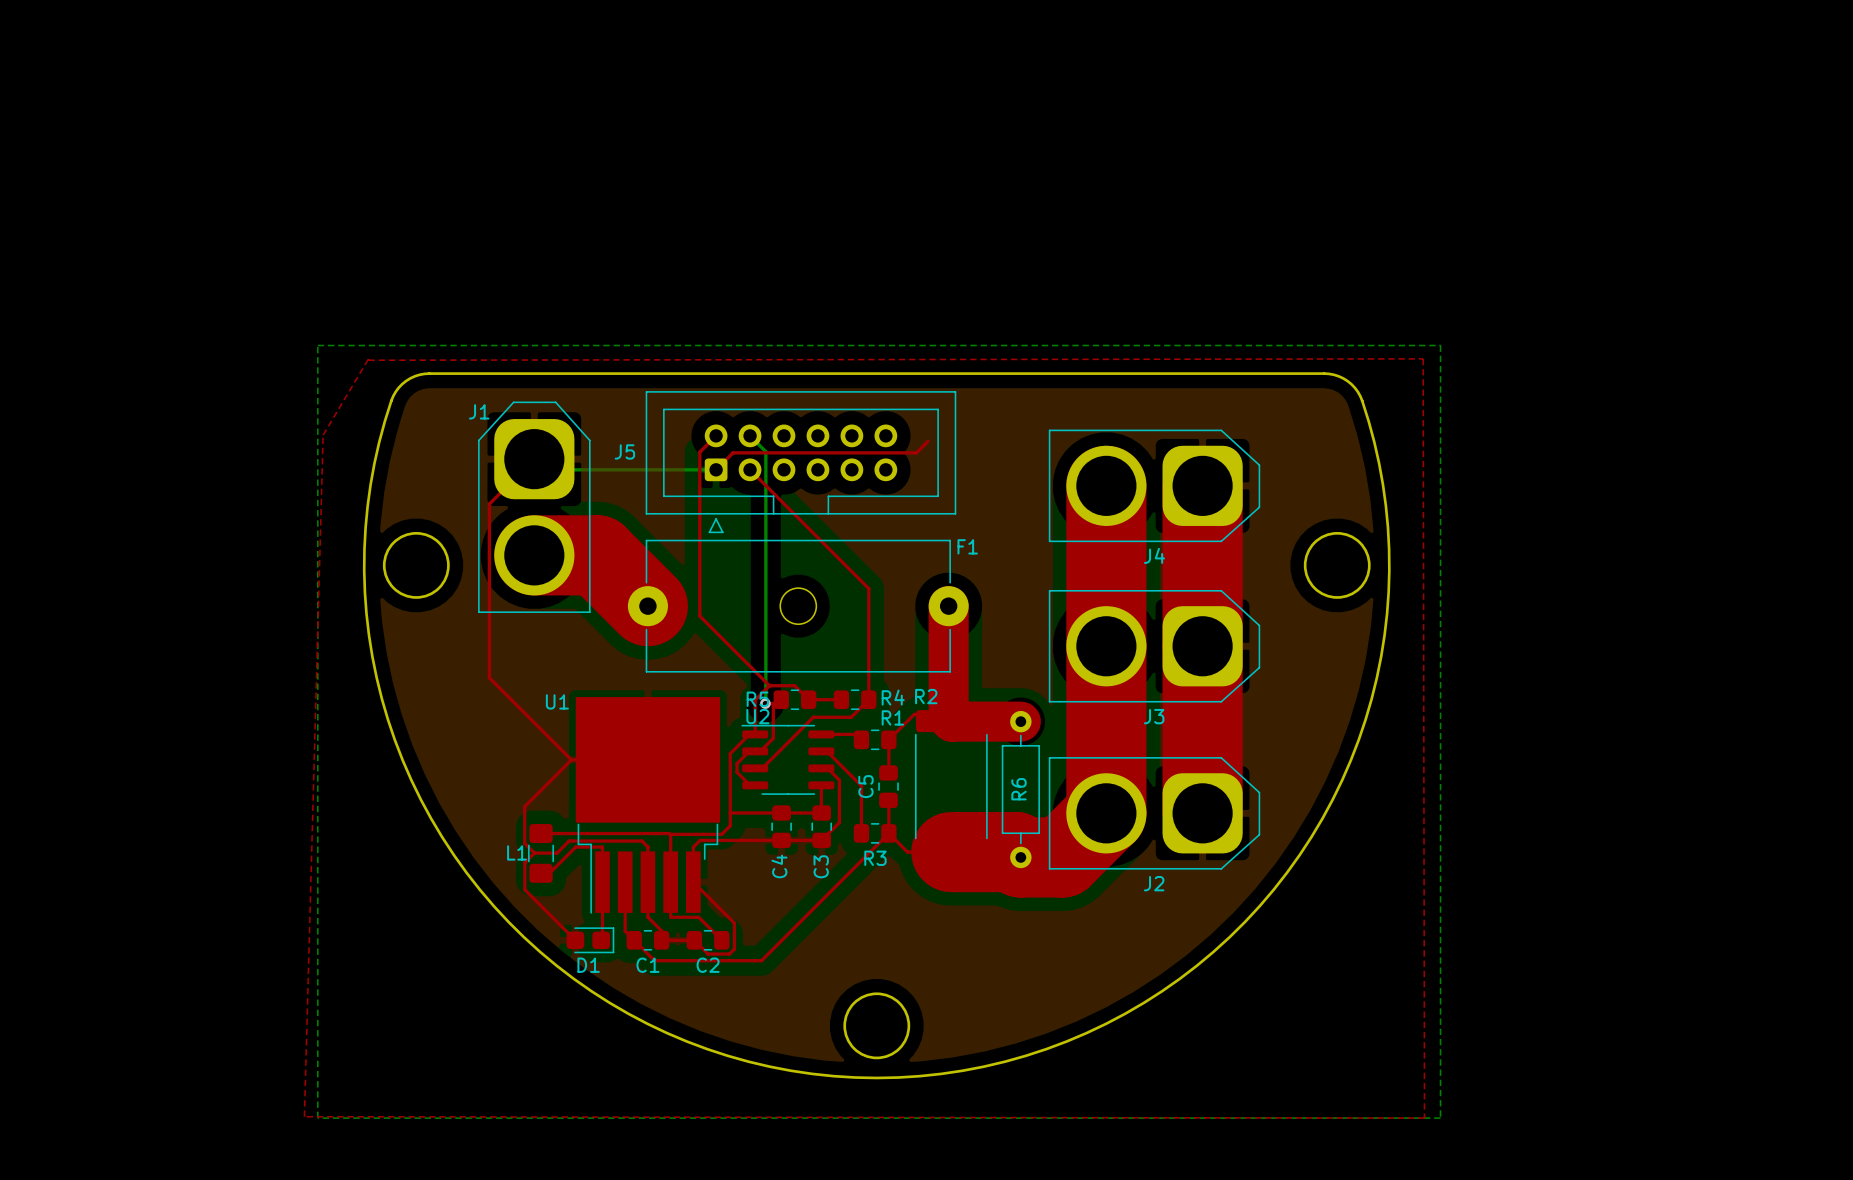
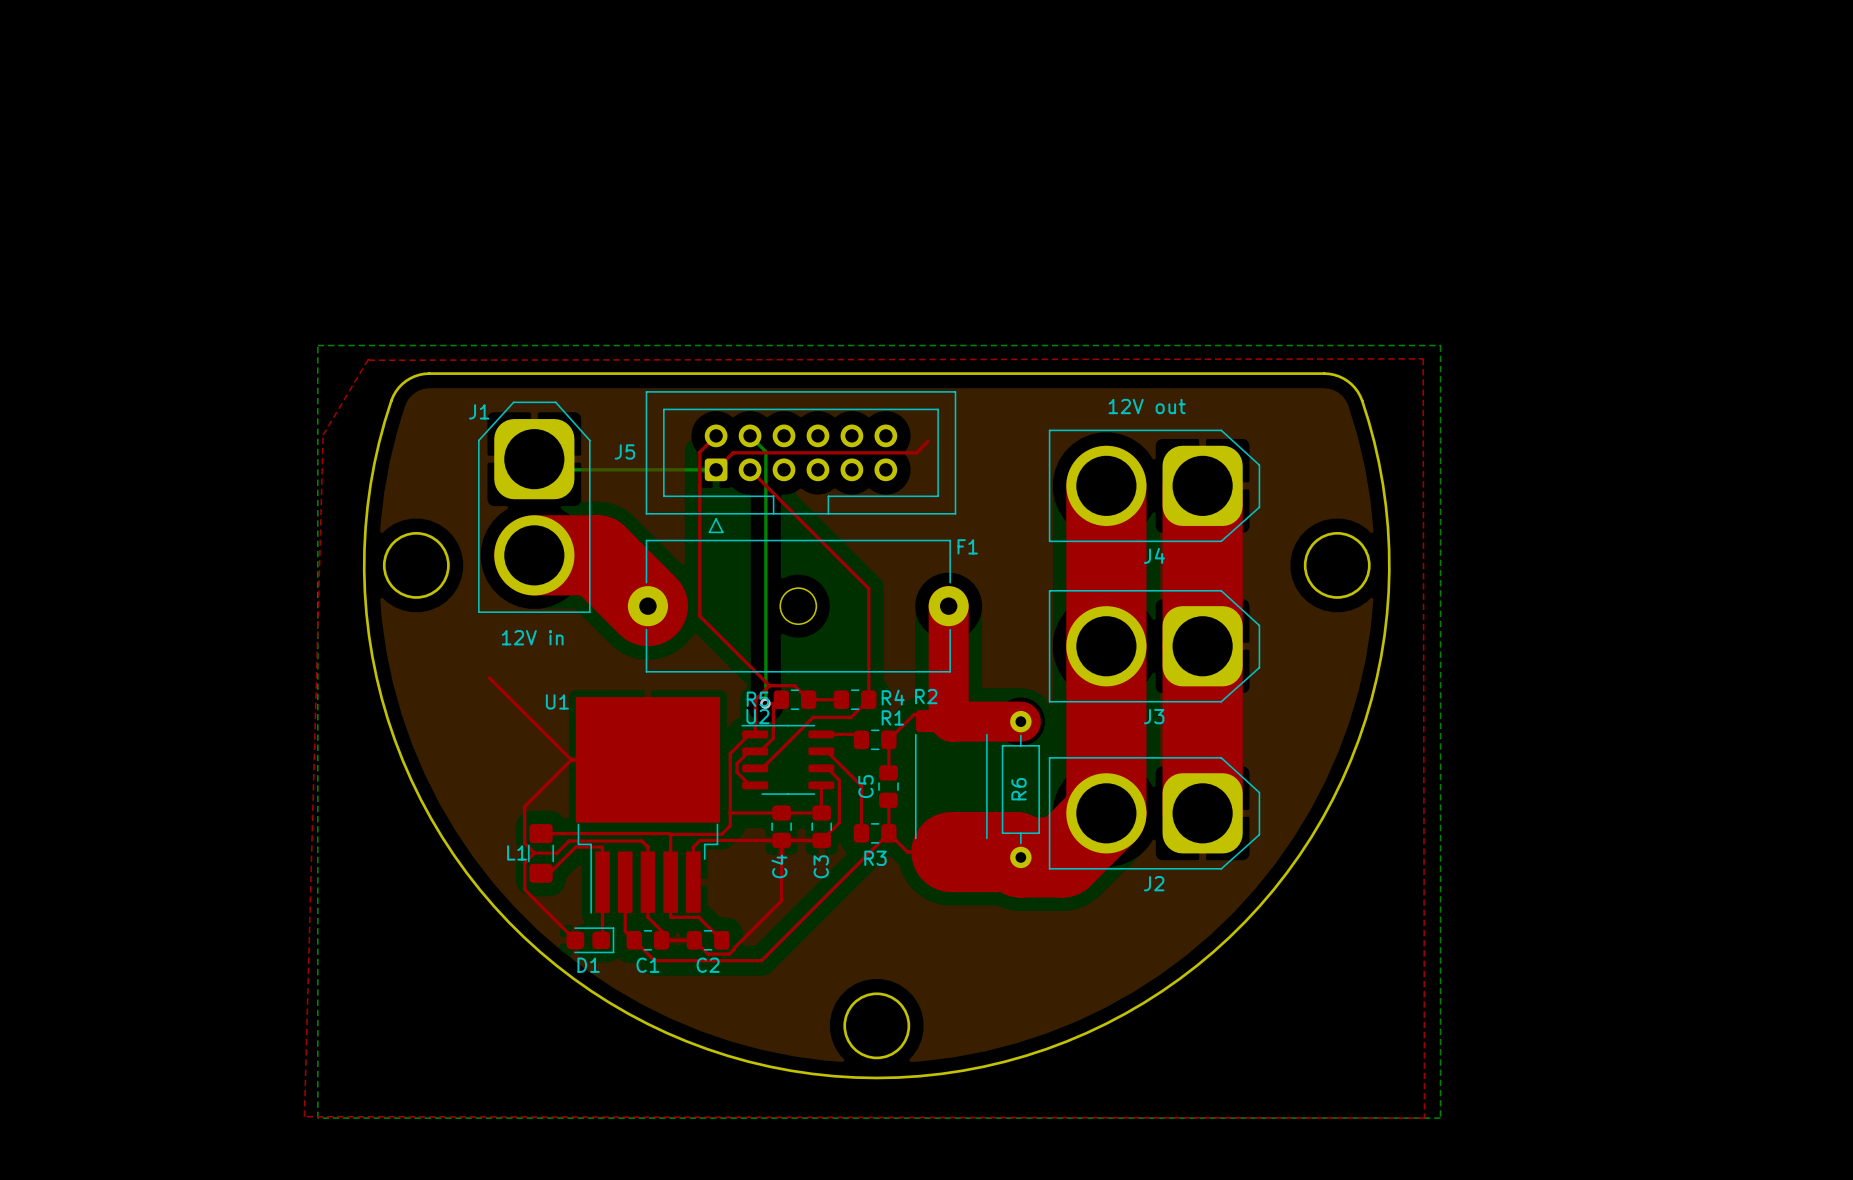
text: none -> 12V out (1147, 406)
top track: (534, 459) (489, 504) (489, 677) -> none
text: none -> 12V in (532, 637)
top track: (693, 882) (734, 923) (734, 947) -> (781, 840) (781, 900) (734, 947)

